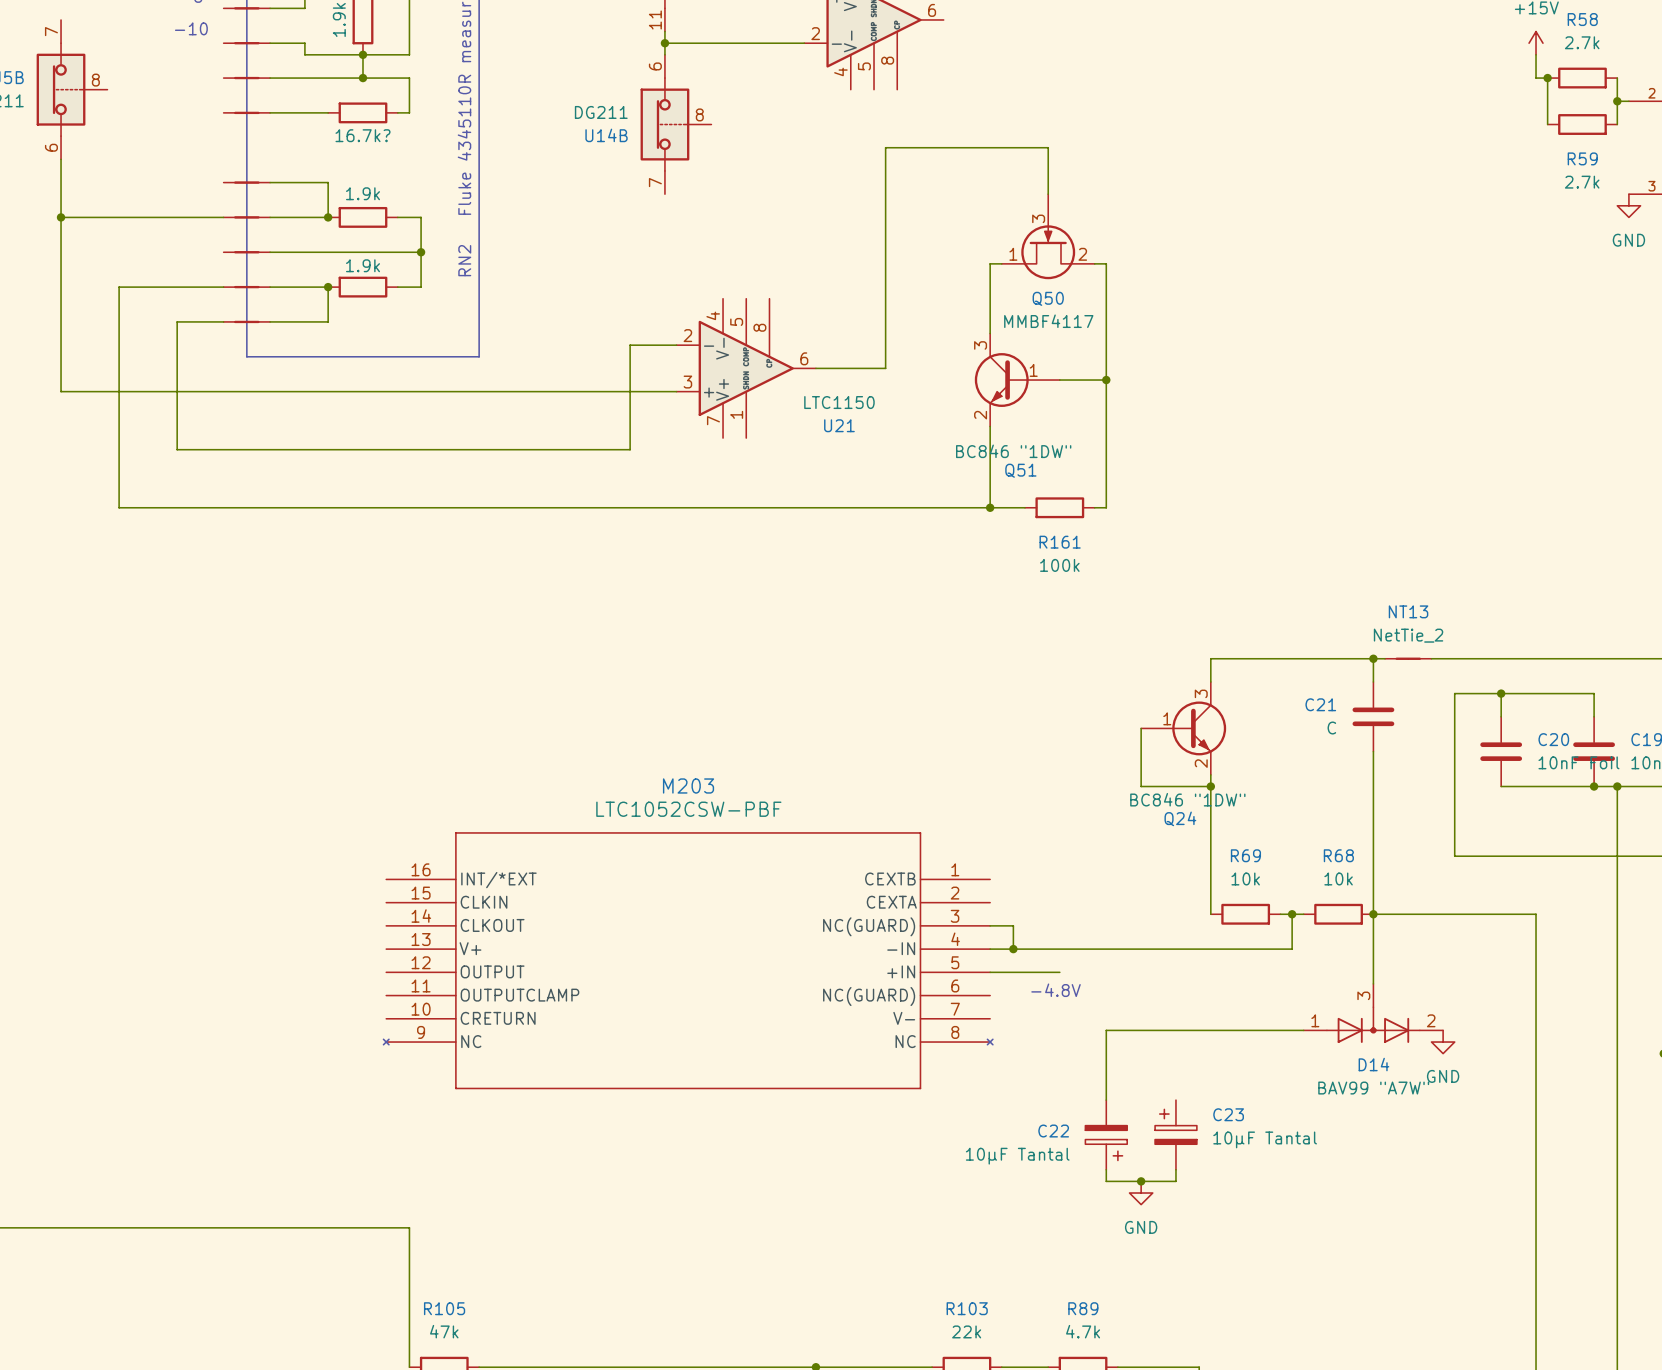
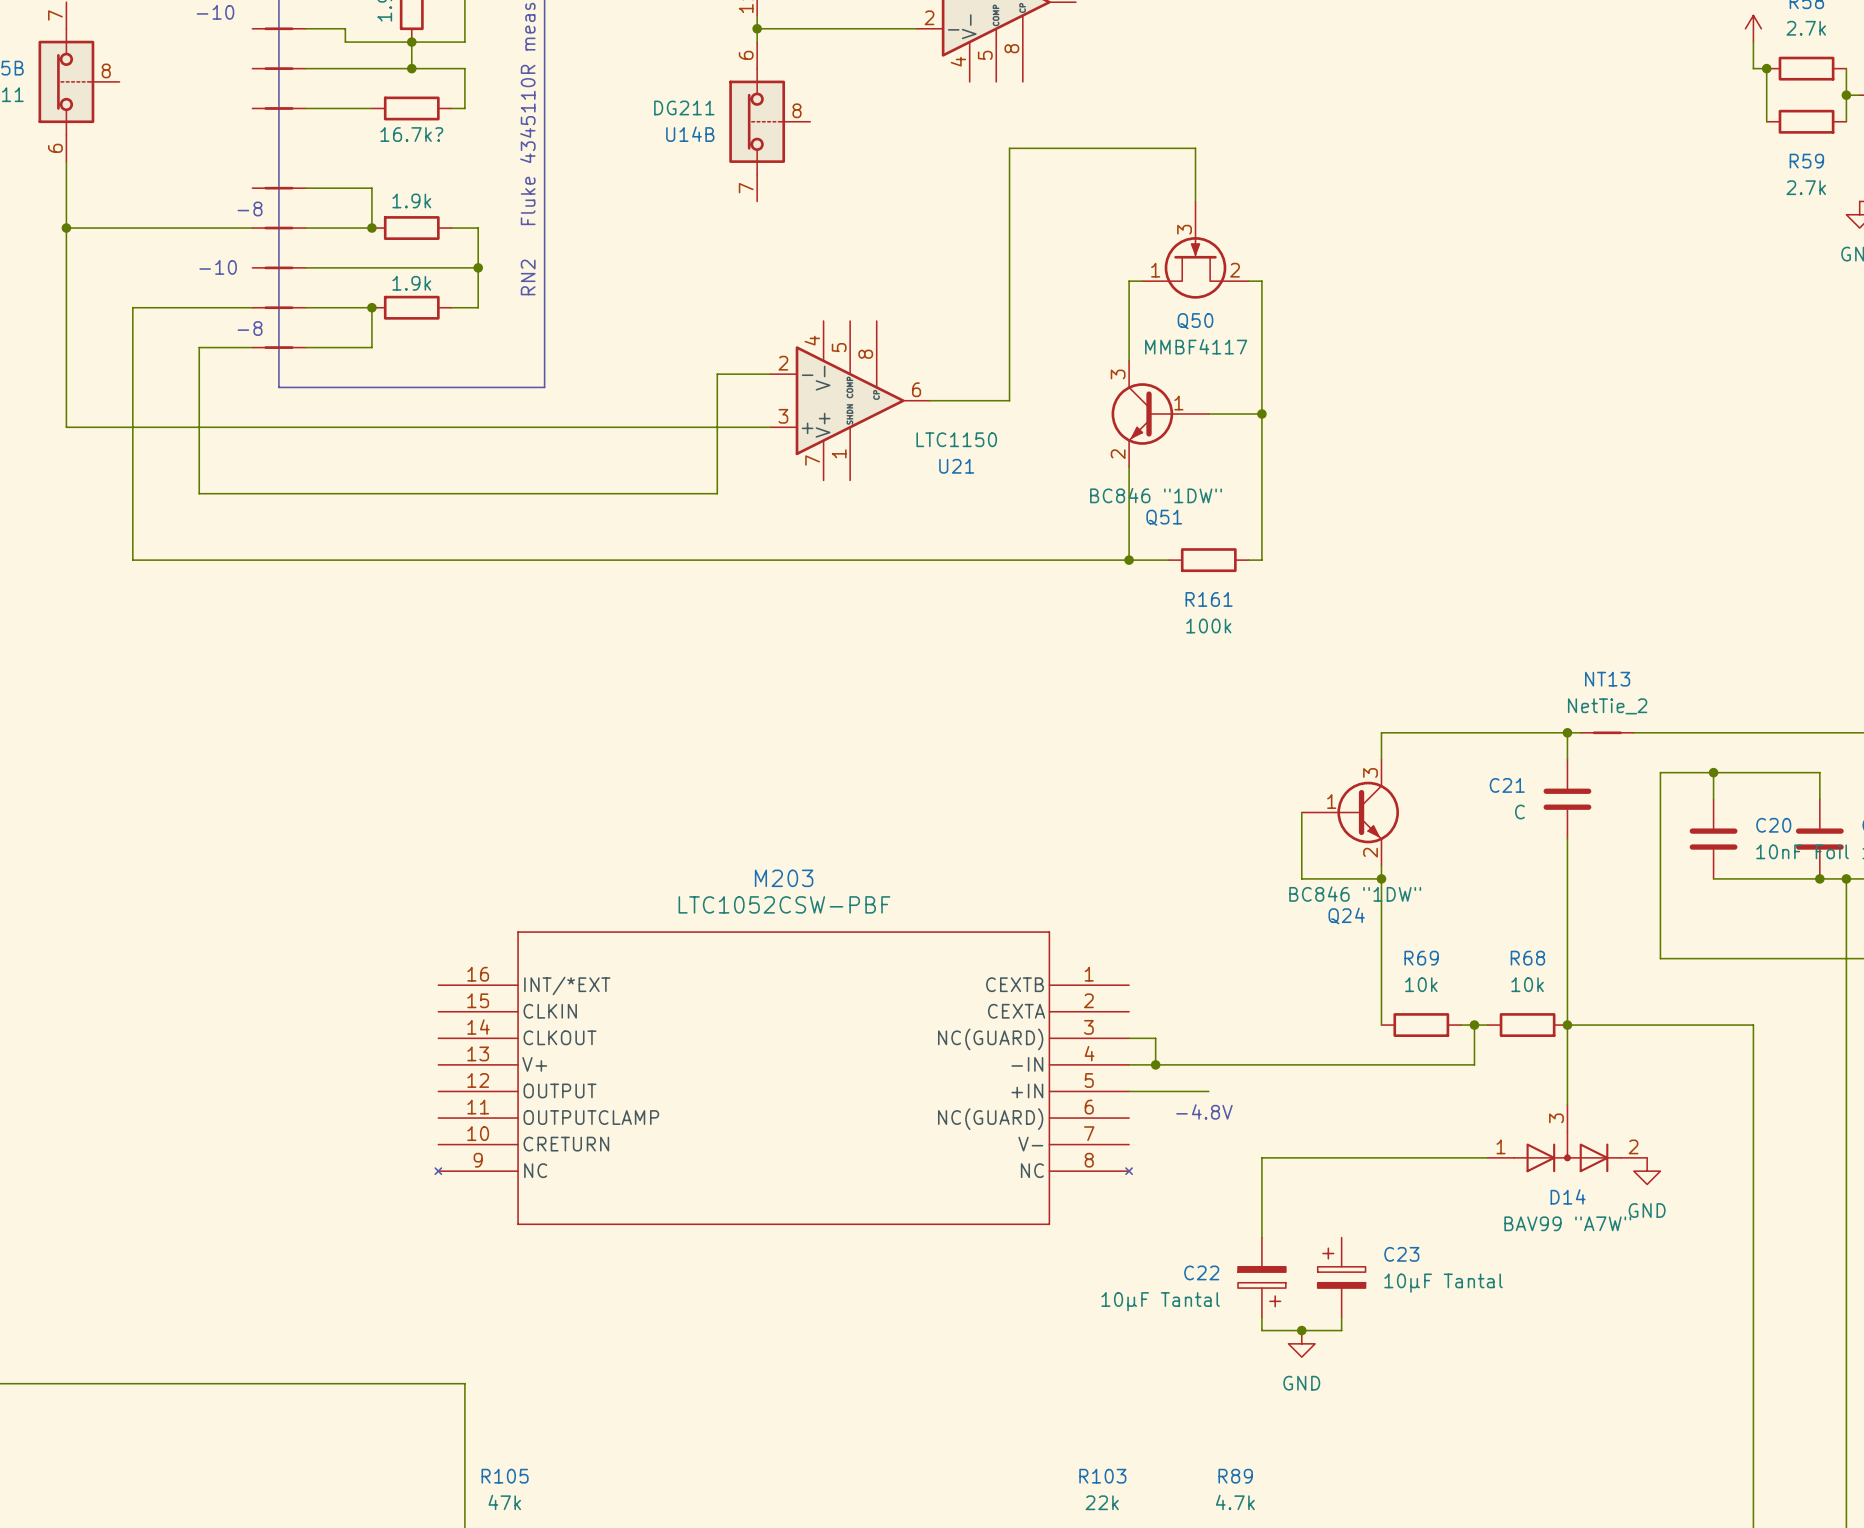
text: none -> -8 (250, 208)
text: none -> -10 (218, 267)
text: none -> -8 (250, 328)

